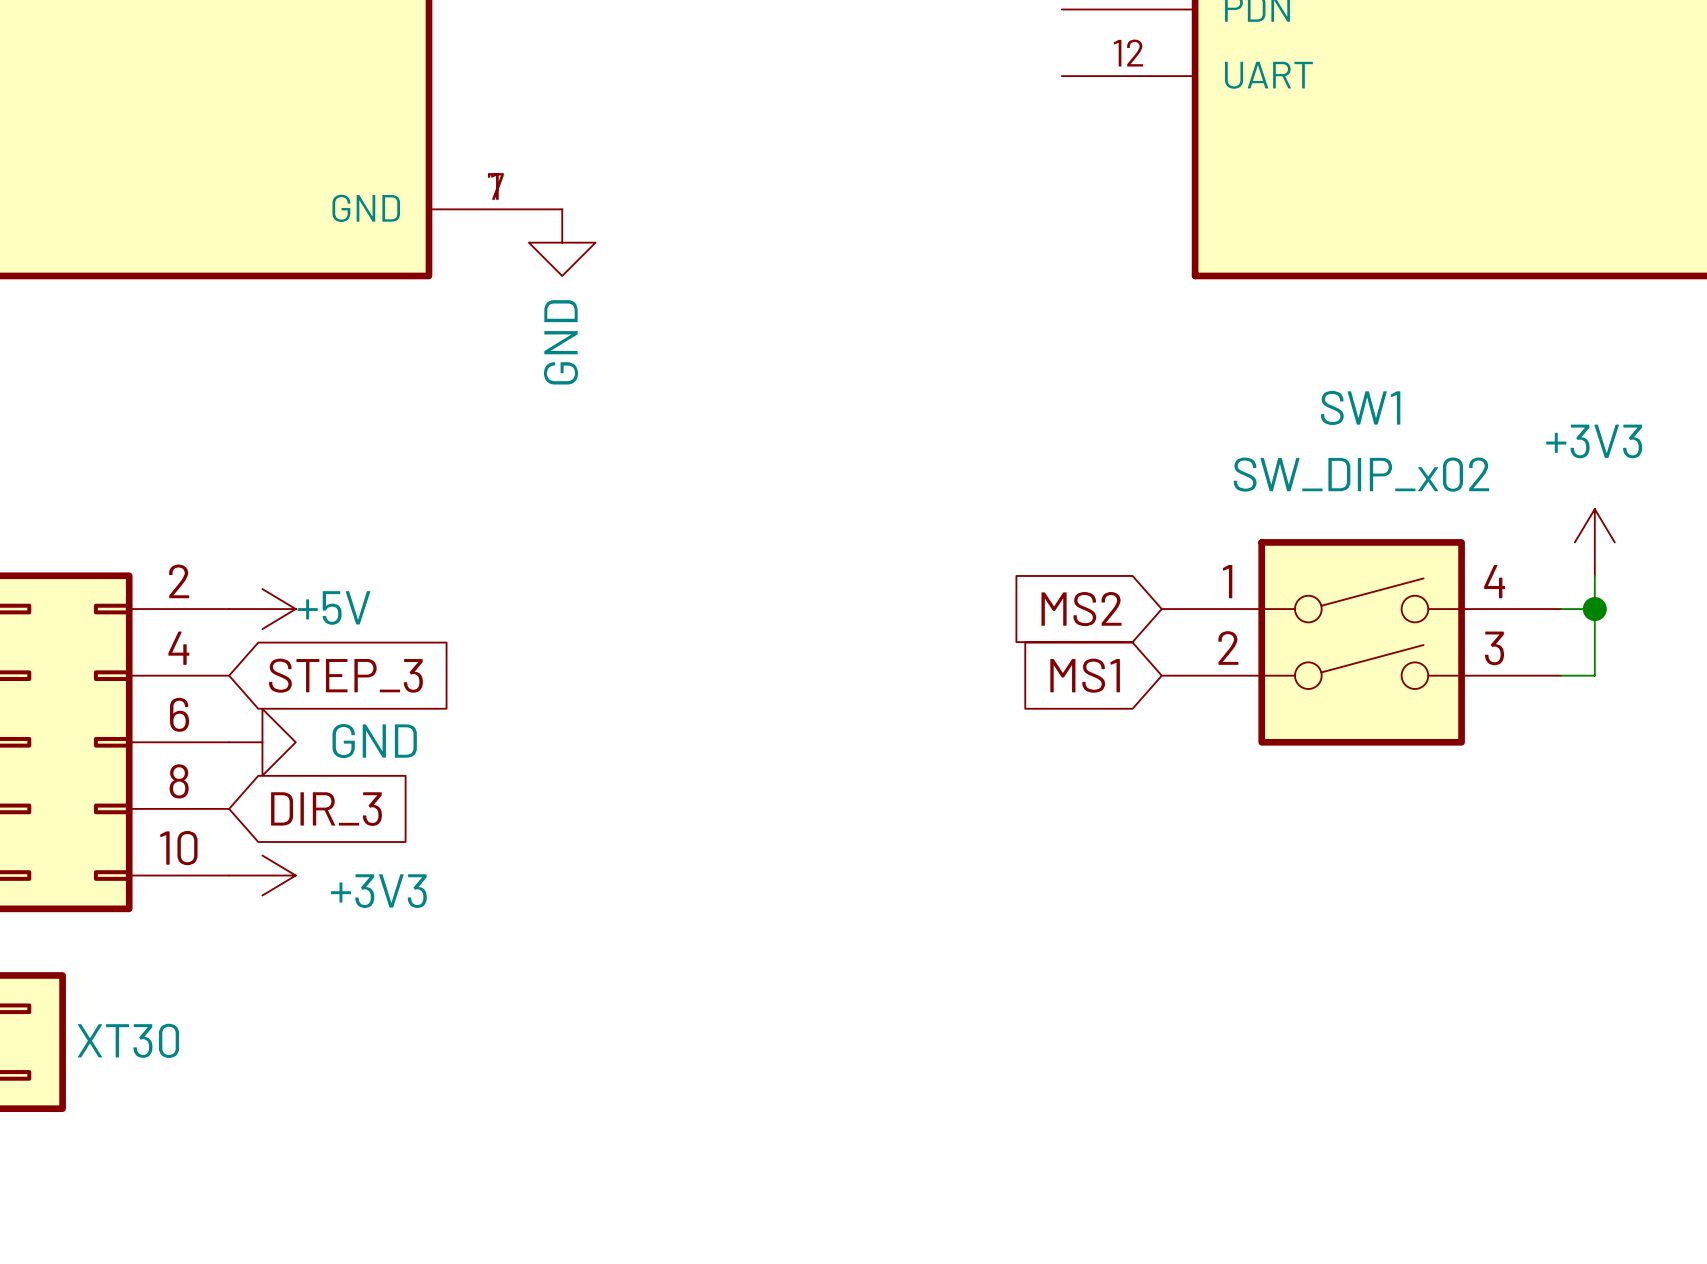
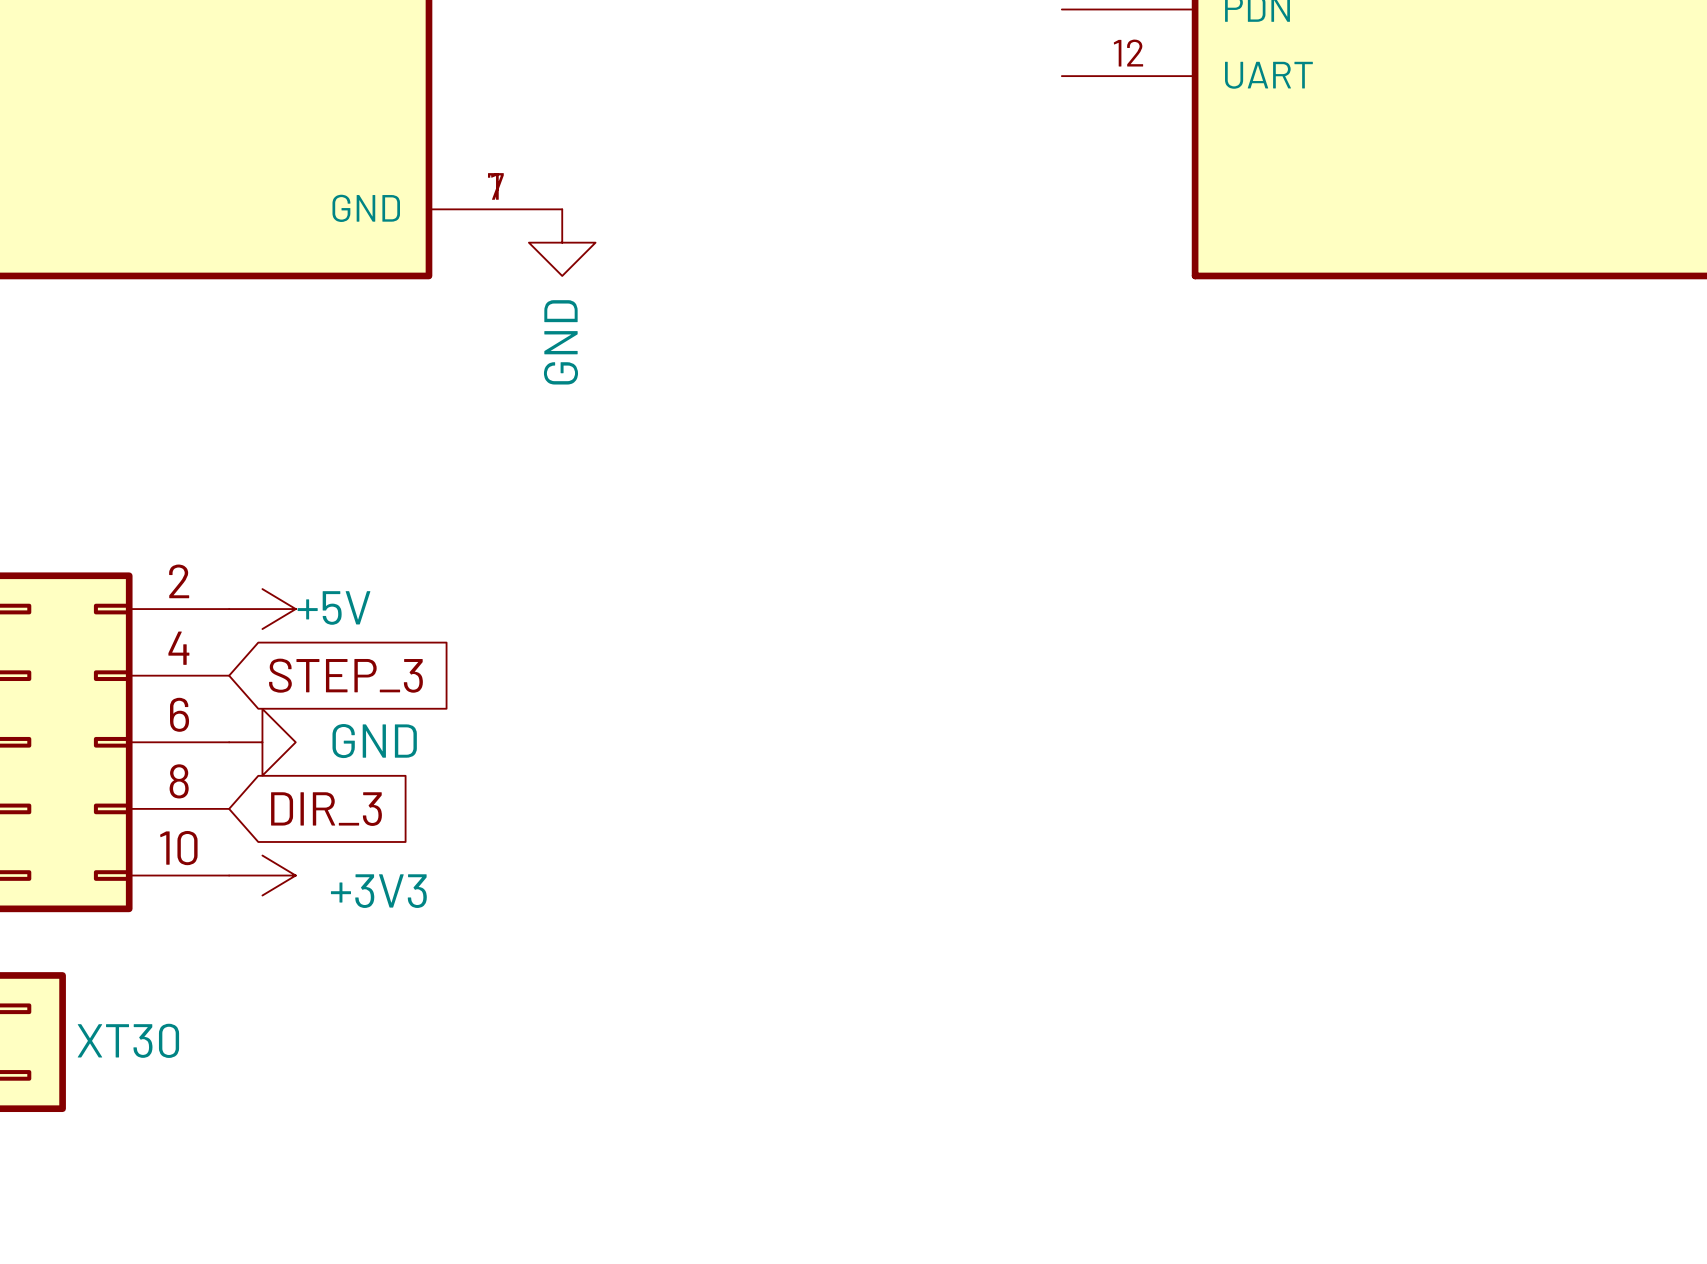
power symbol: +3V3 (1594, 542) -> none
wire: (1594, 575) (1594, 675) (1561, 675) -> none
global label: MS2 (1081, 609) -> none
wire: (1561, 609) (1594, 609) -> none
junction: (1594, 609) -> none
SW1: SW_DIP_x02 (1361, 642) -> none
global label: MS1 (1085, 675) -> none

